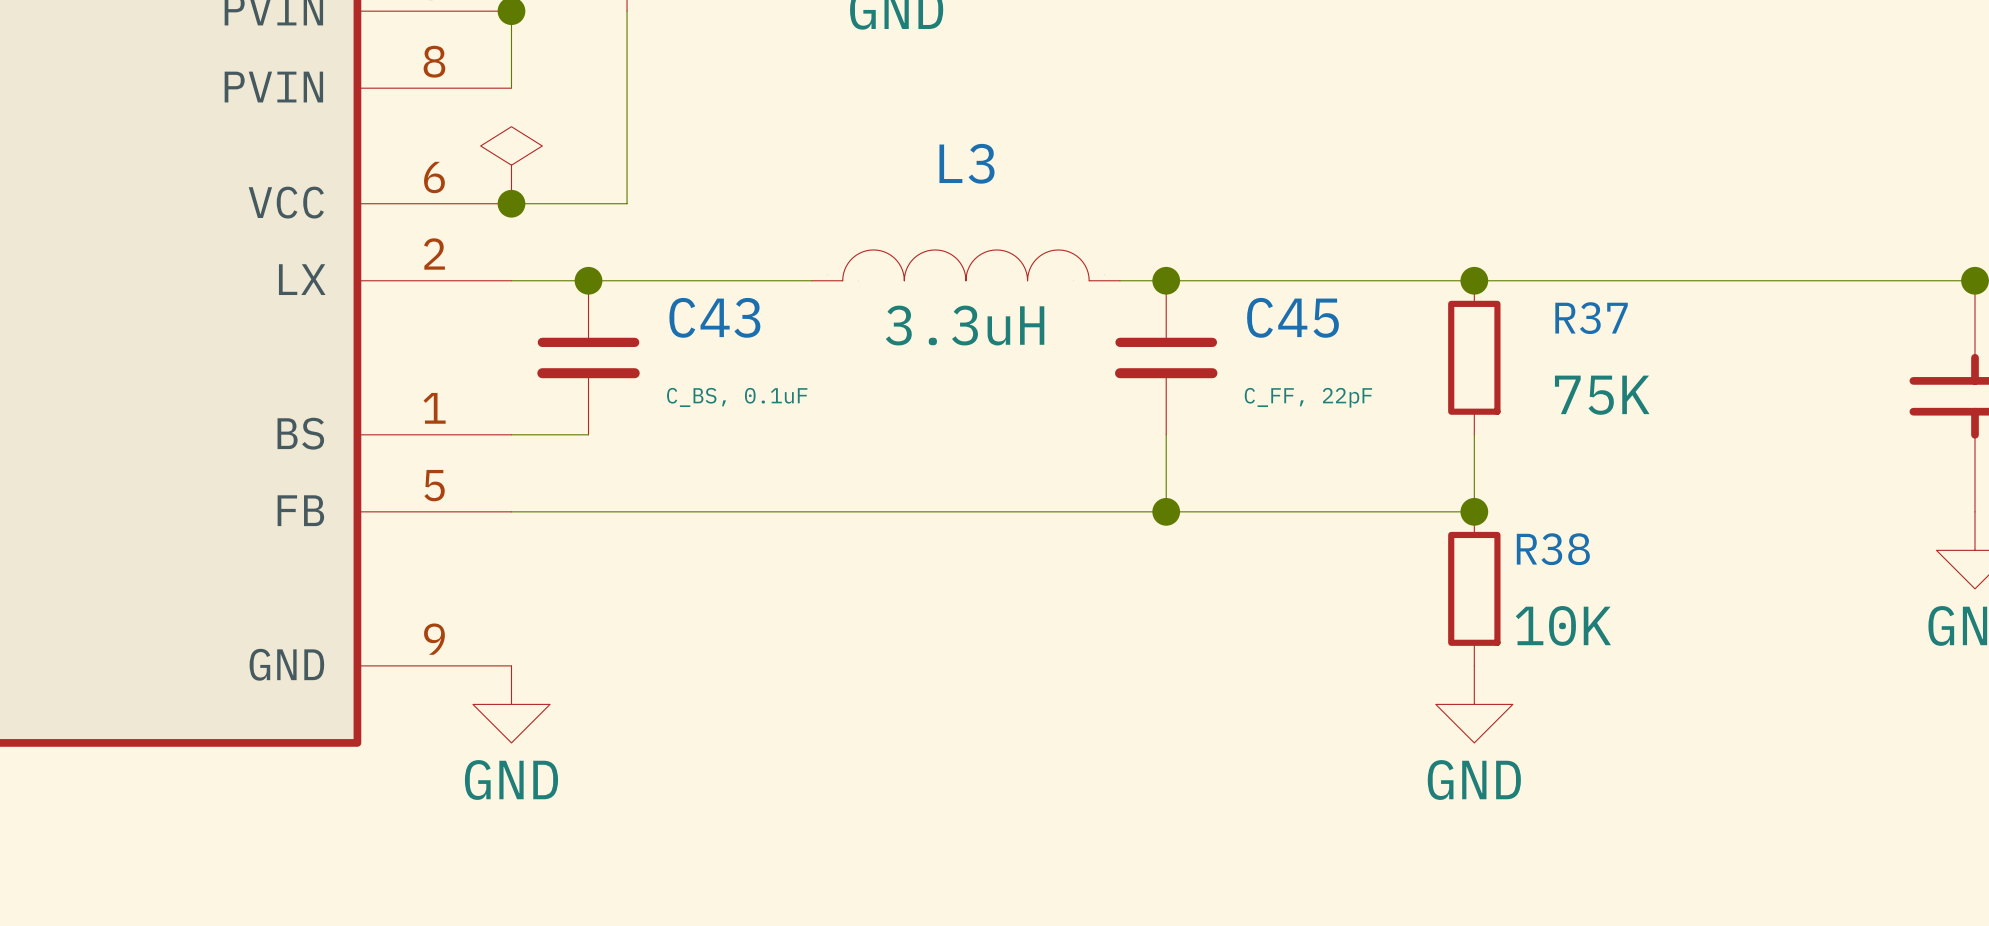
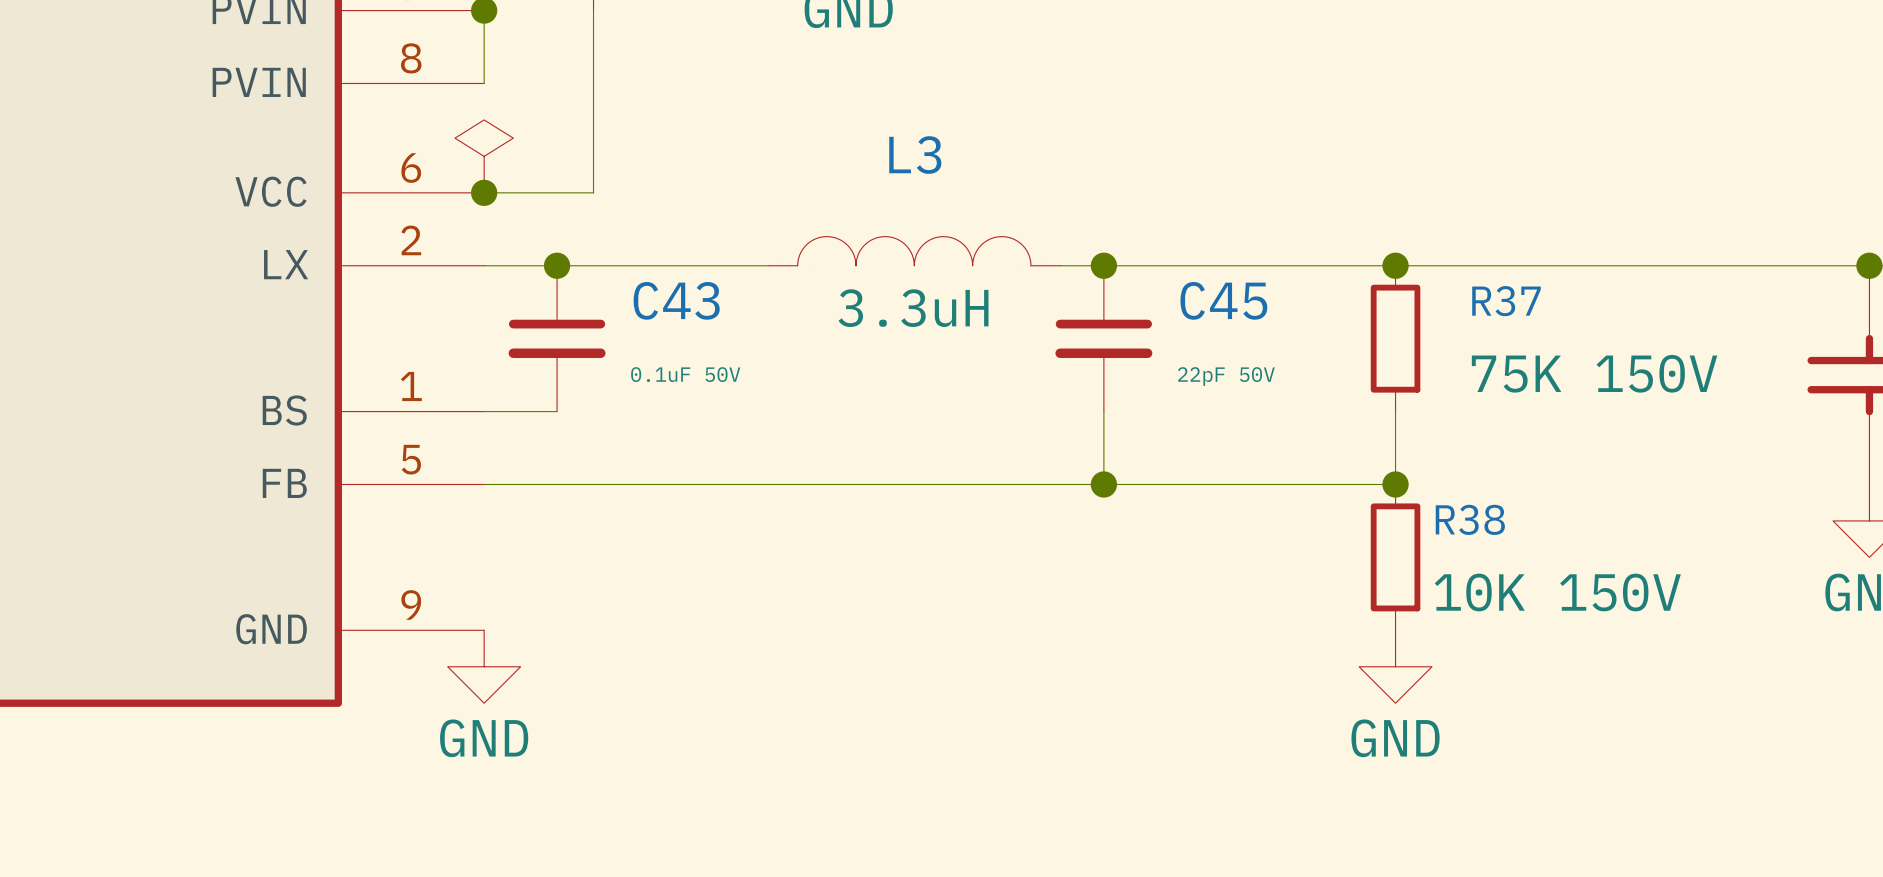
R37 value: 75K (1602, 395) -> 75K 150V (1594, 373)
C43 value: C_BS, 0.1uF (737, 397) -> 0.1uF 50V (685, 374)
C45 value: C_FF, 22pF (1308, 397) -> 22pF 50V (1226, 376)
R38 value: 10K (1563, 625) -> 10K 150V (1557, 592)

